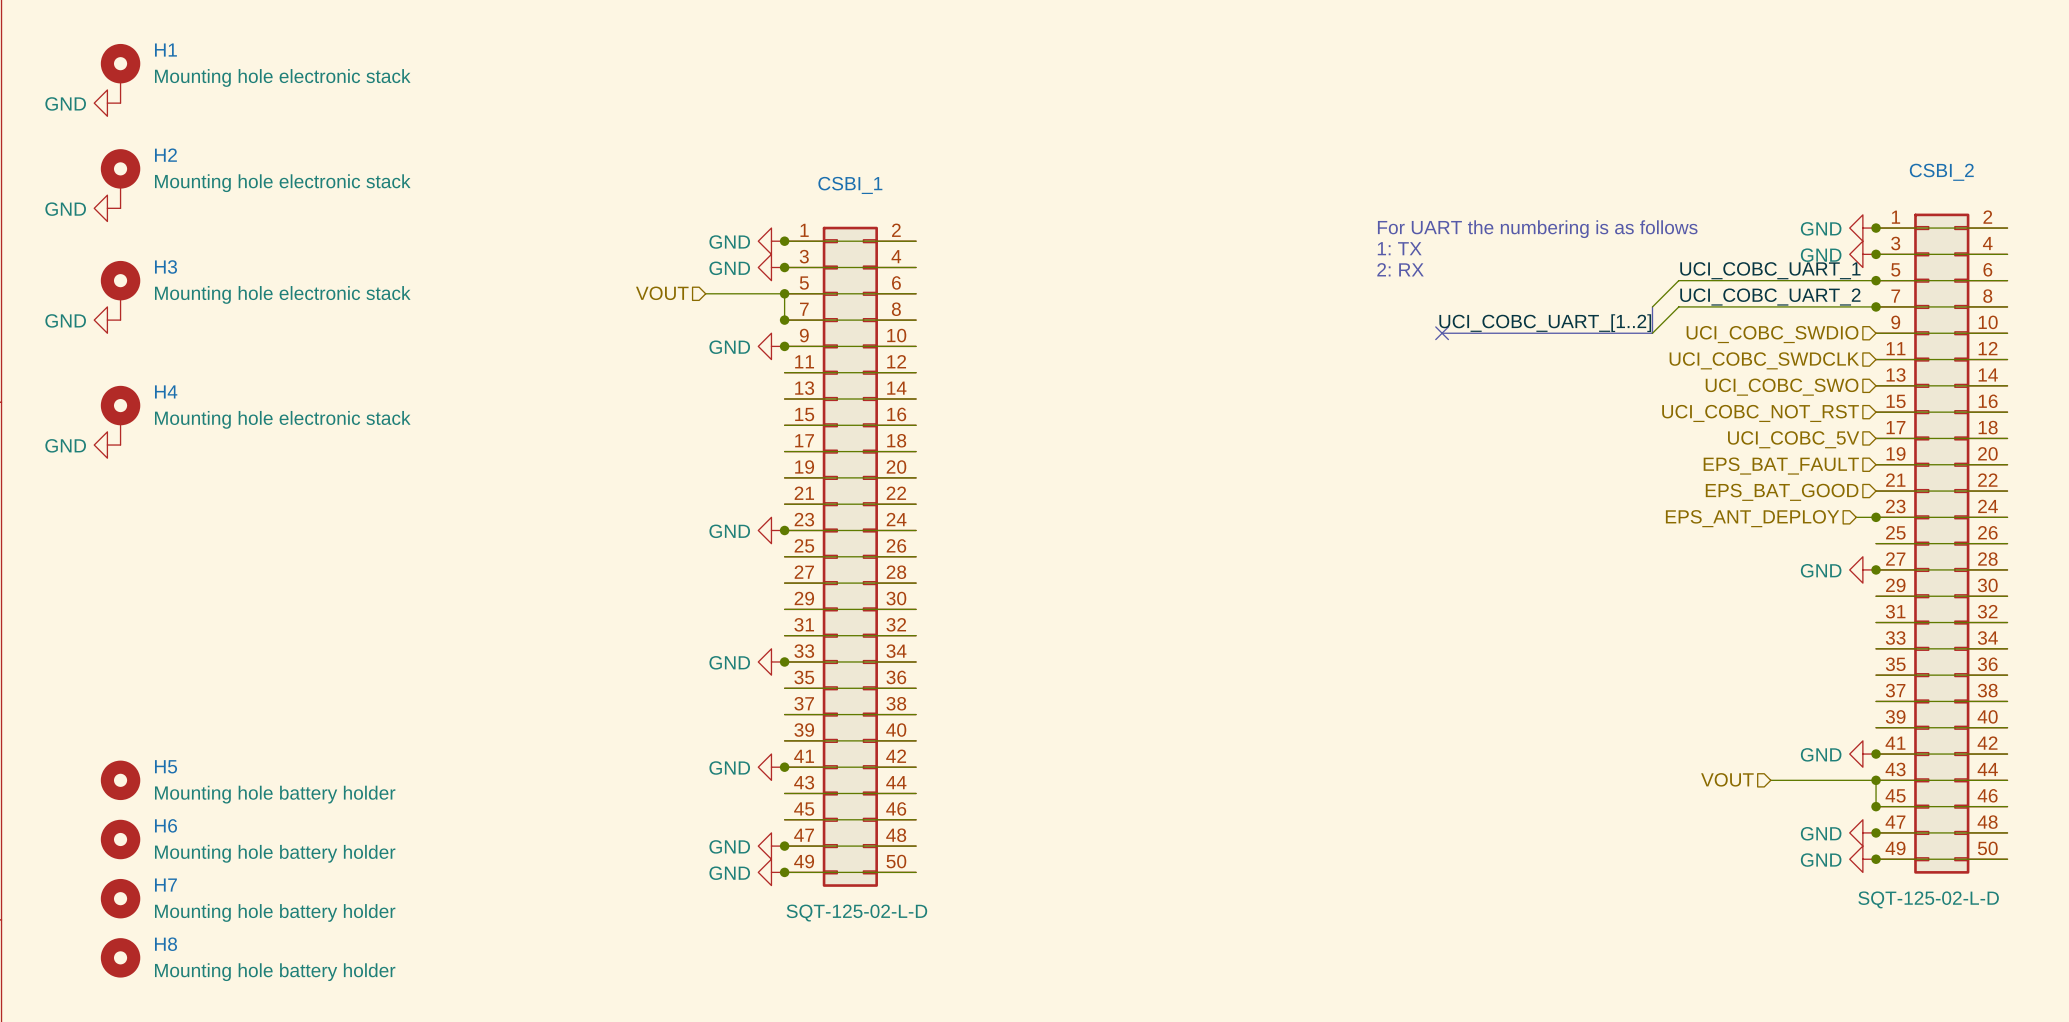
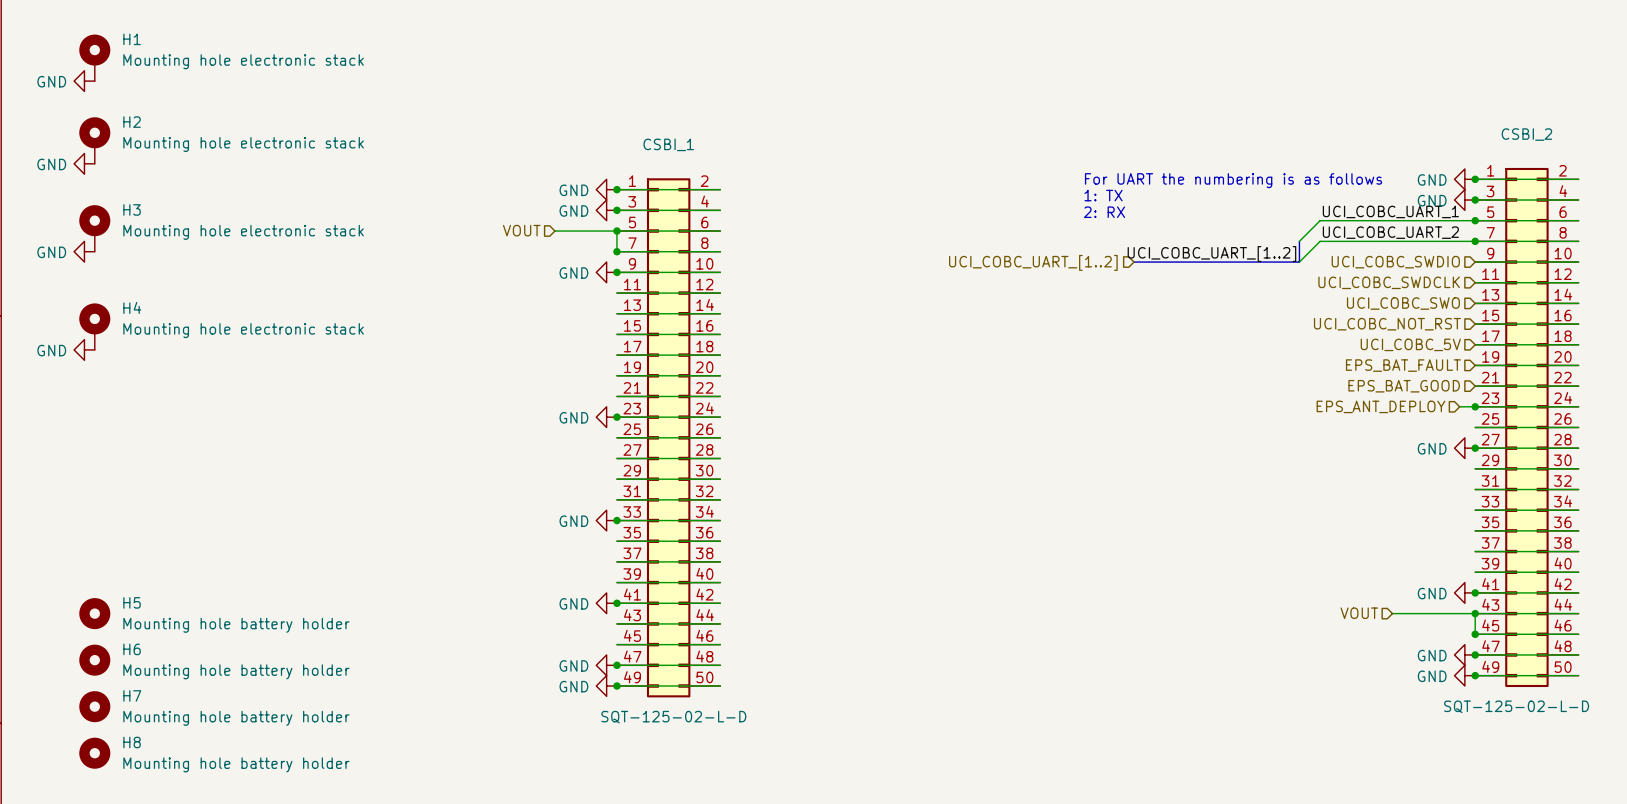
no-connect mark: (1442, 333) -> none
hierarchical label: none -> UCI_COBC_UART_[1..2] (1033, 262)

